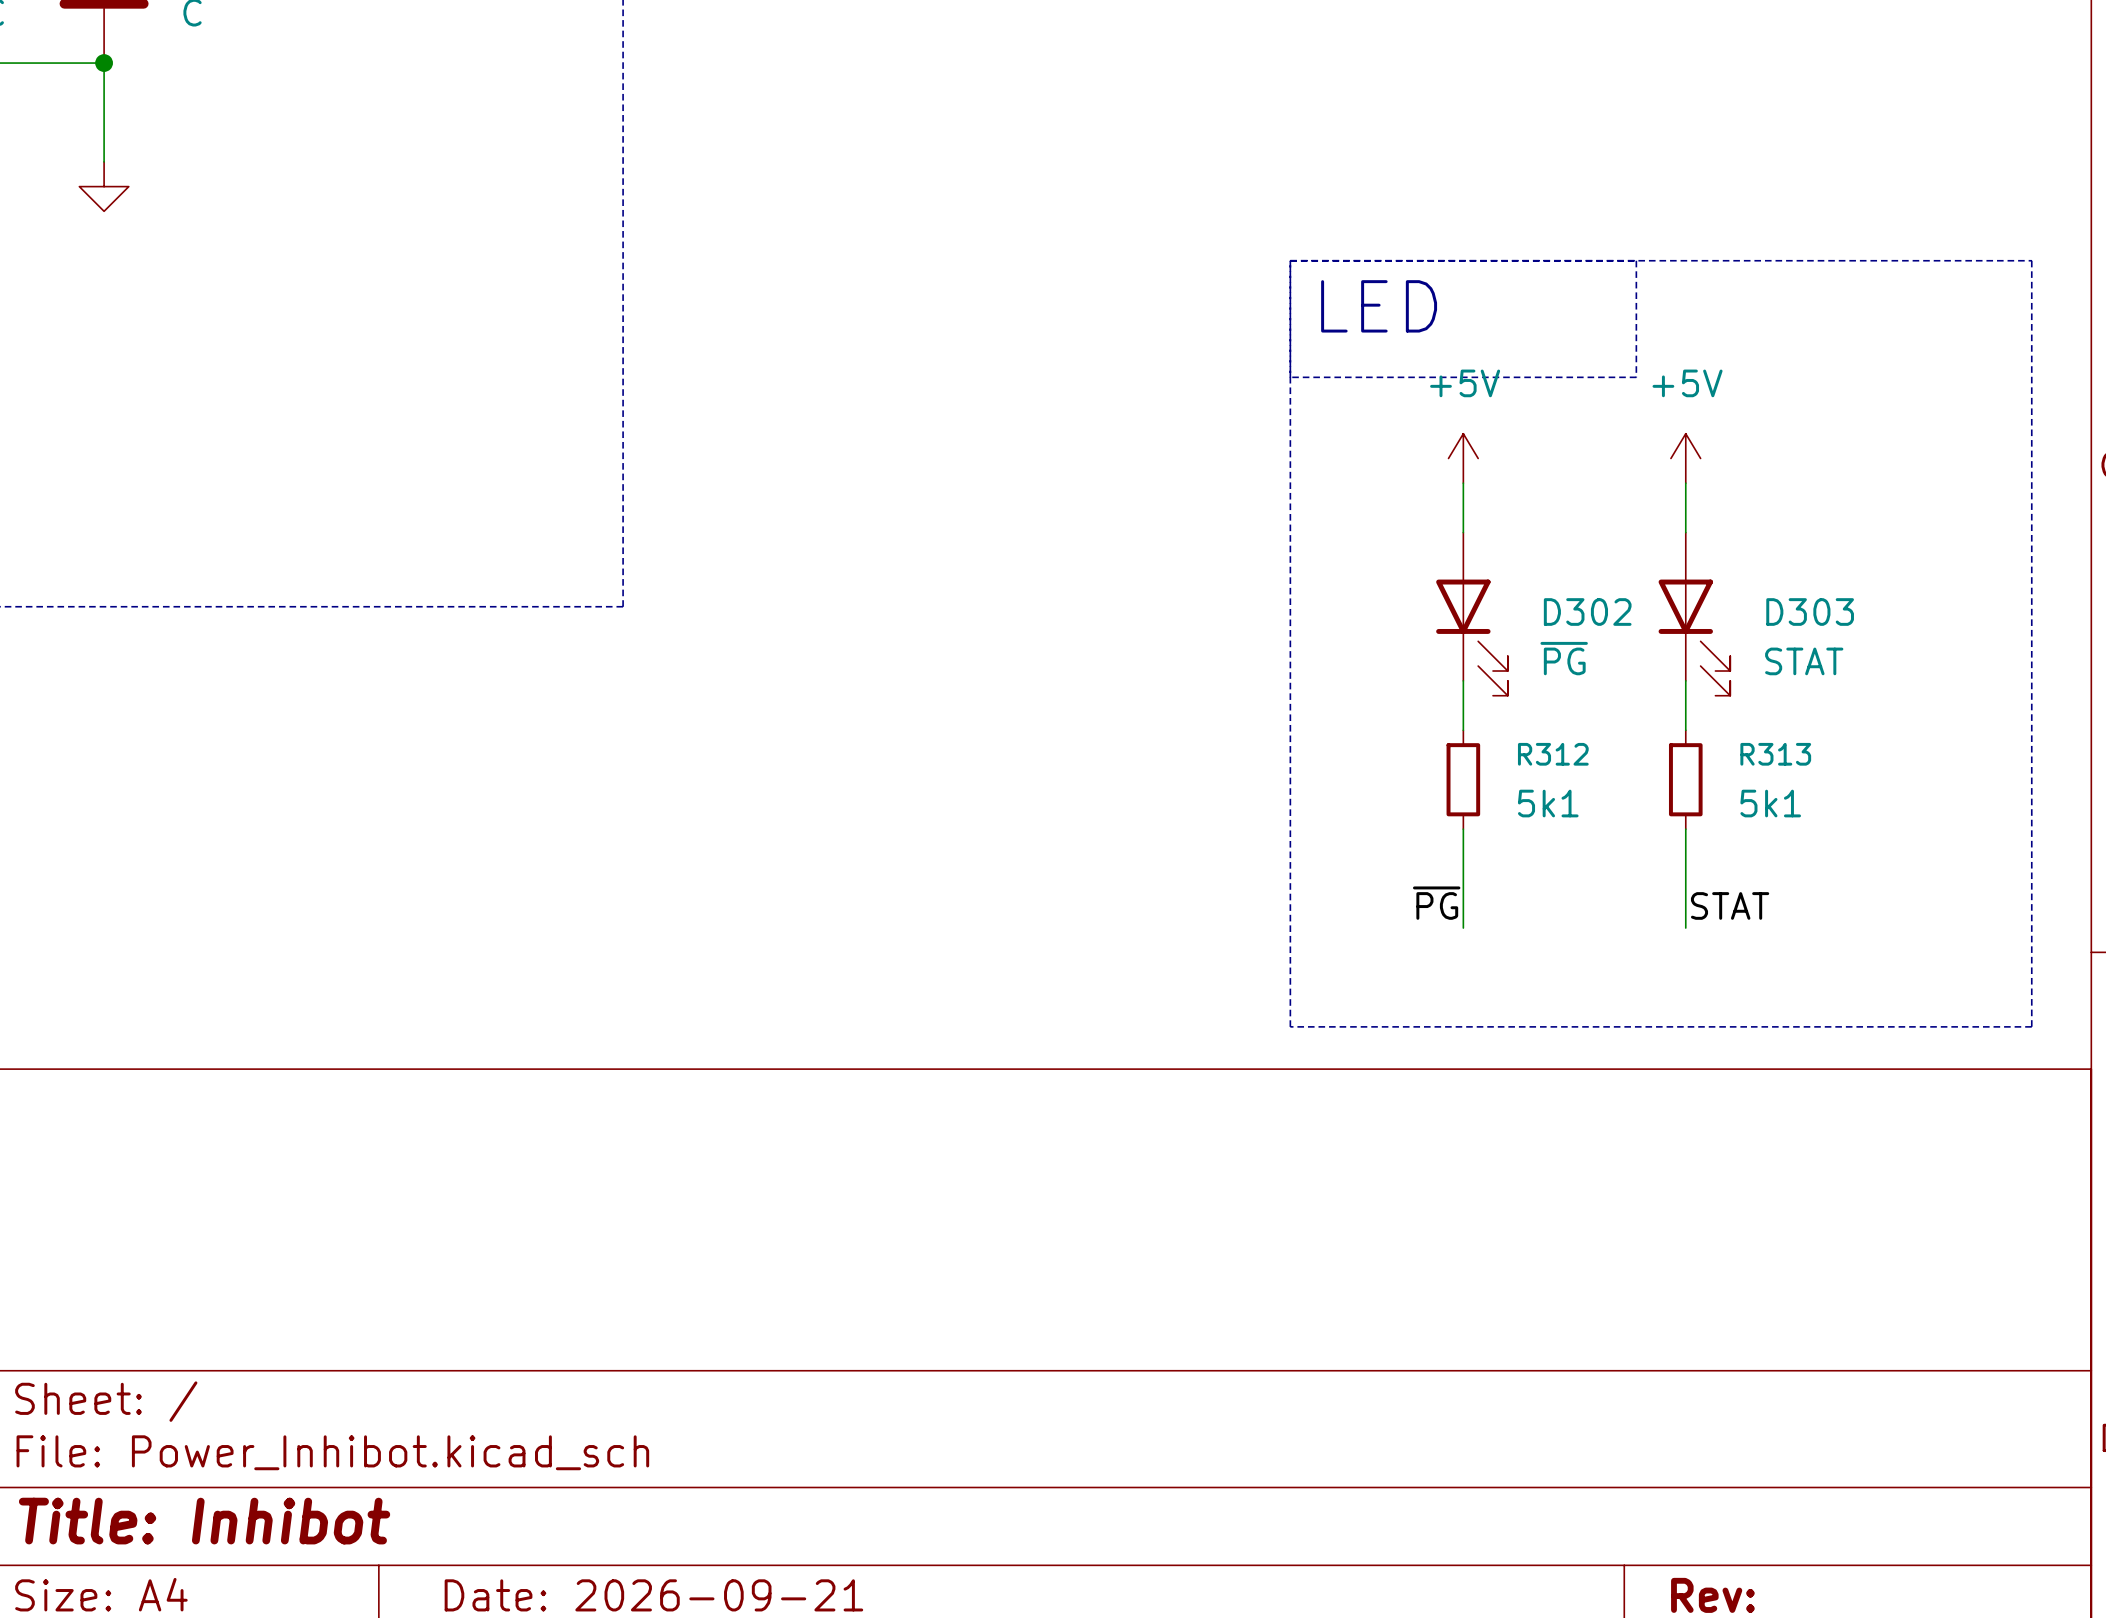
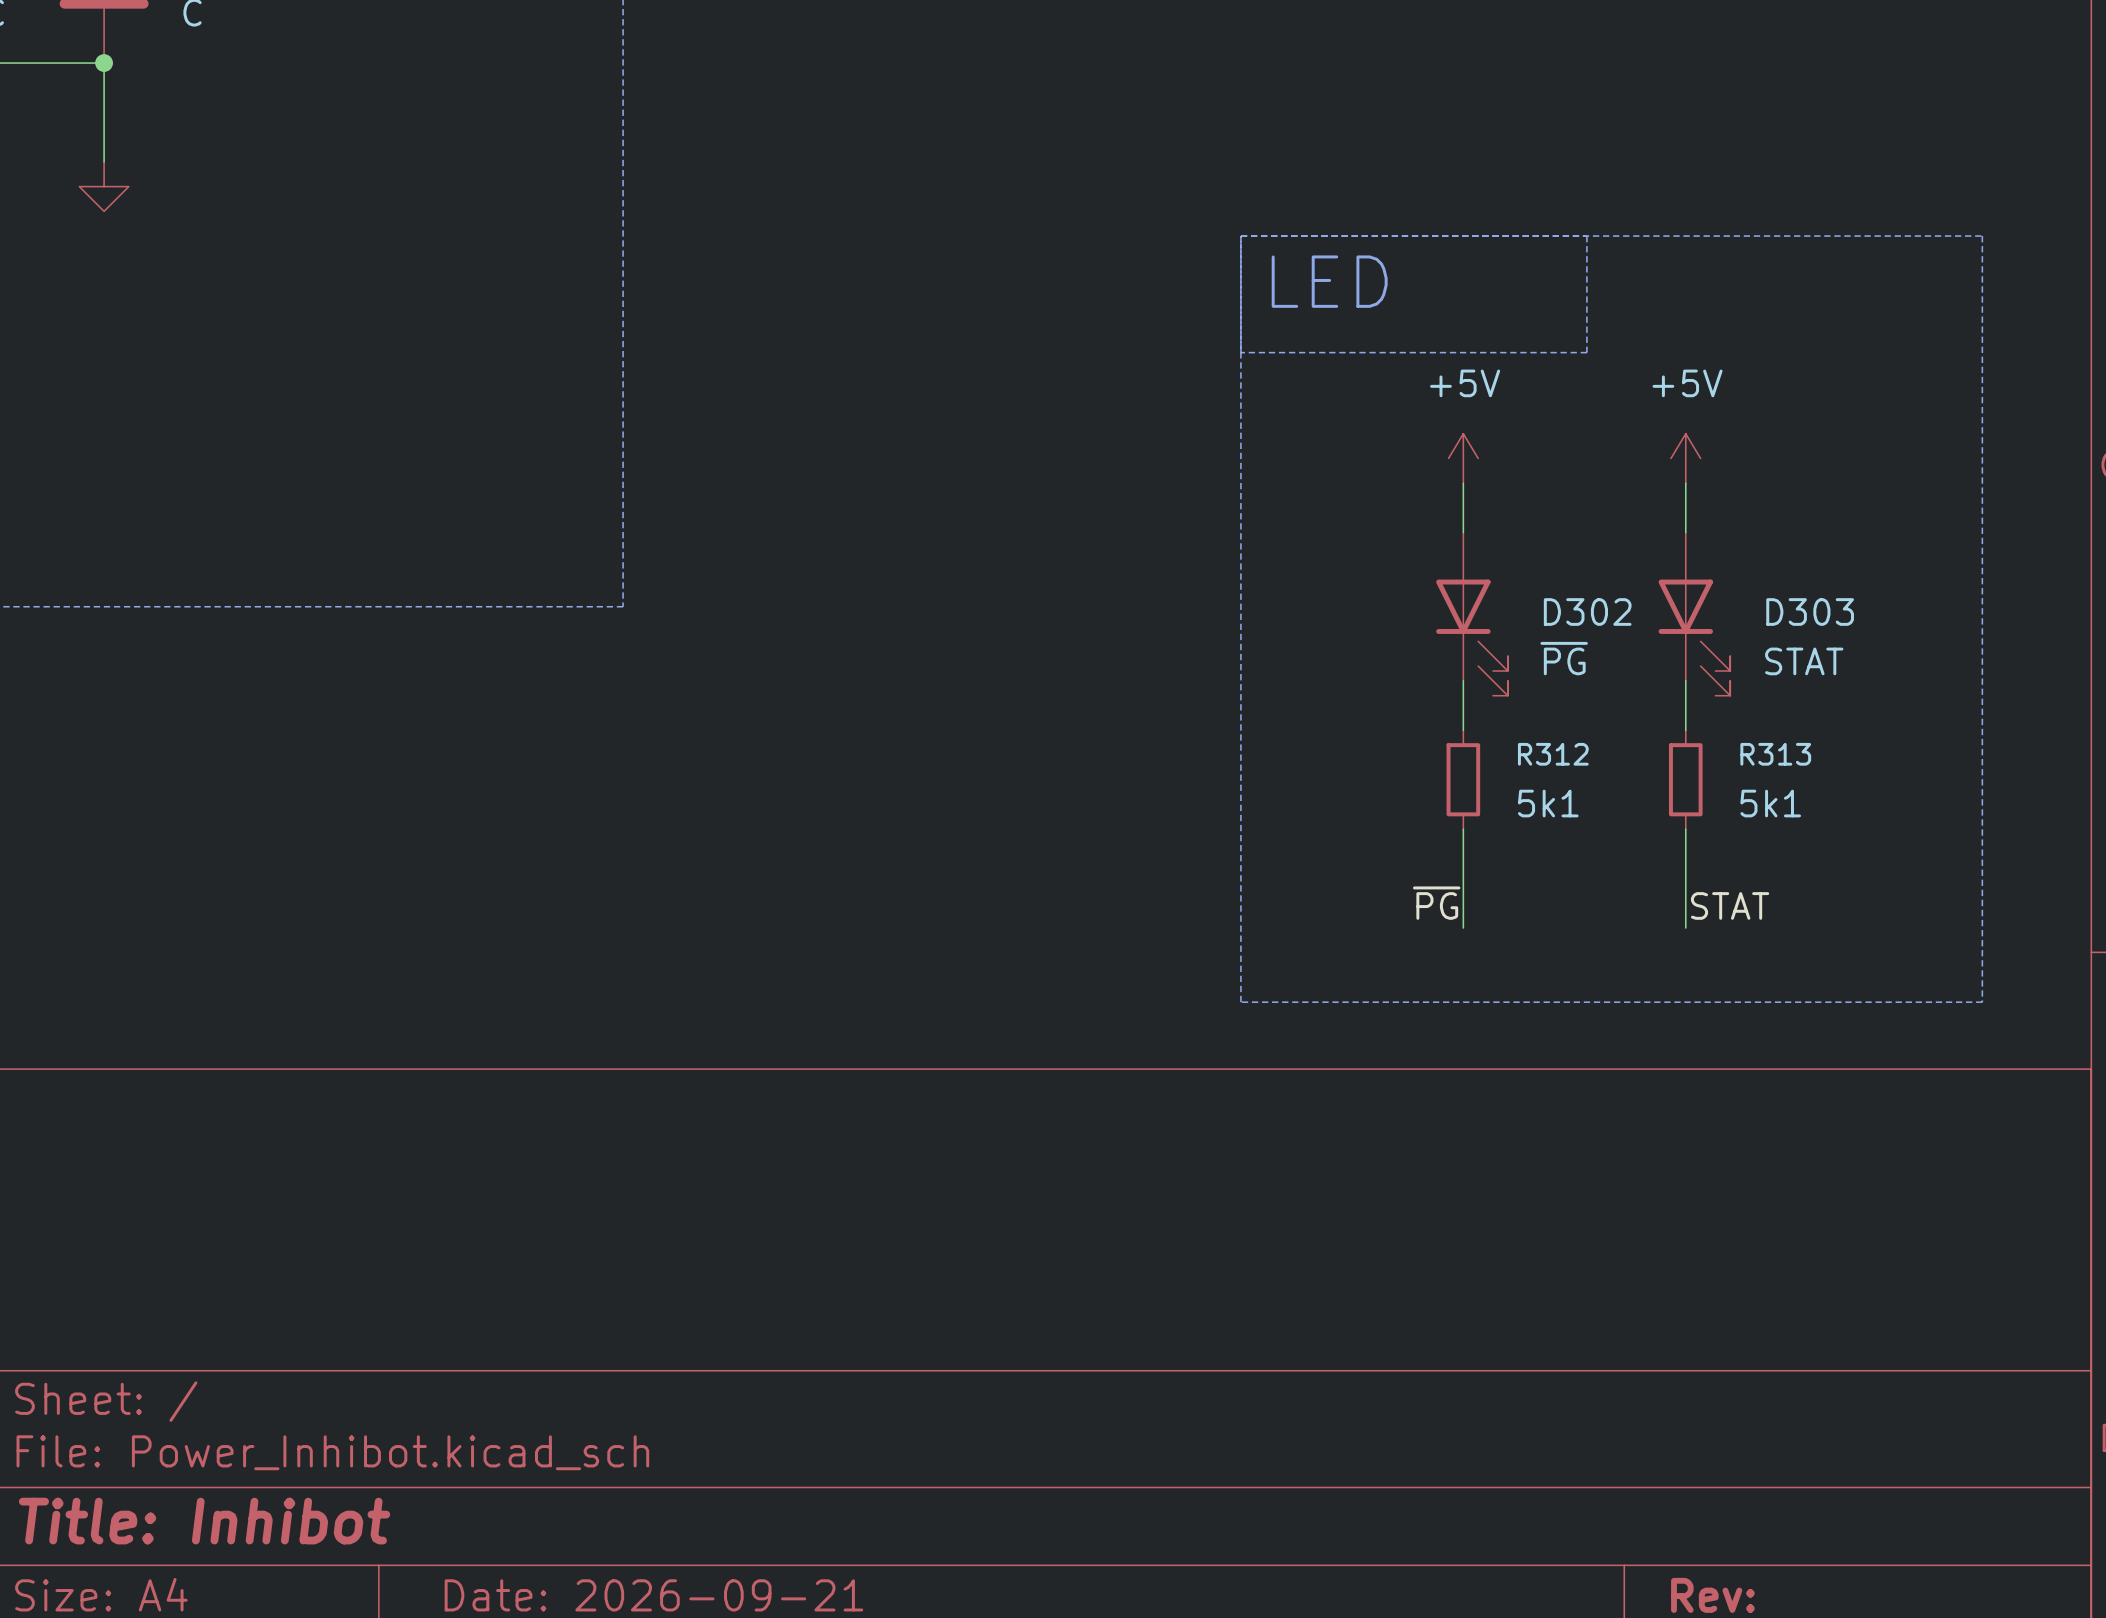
line: (1290, 260) (2031, 260) (2031, 1026) (1290, 1026) (1290, 260) -> (1240, 236) (1240, 1002) (1982, 1002) (1982, 236) (1240, 236)
line: (1636, 260) (1636, 377) (1290, 377) -> (1586, 236) (1586, 352) (1240, 352)
text position: LED (1379, 306) -> LED (1329, 281)

